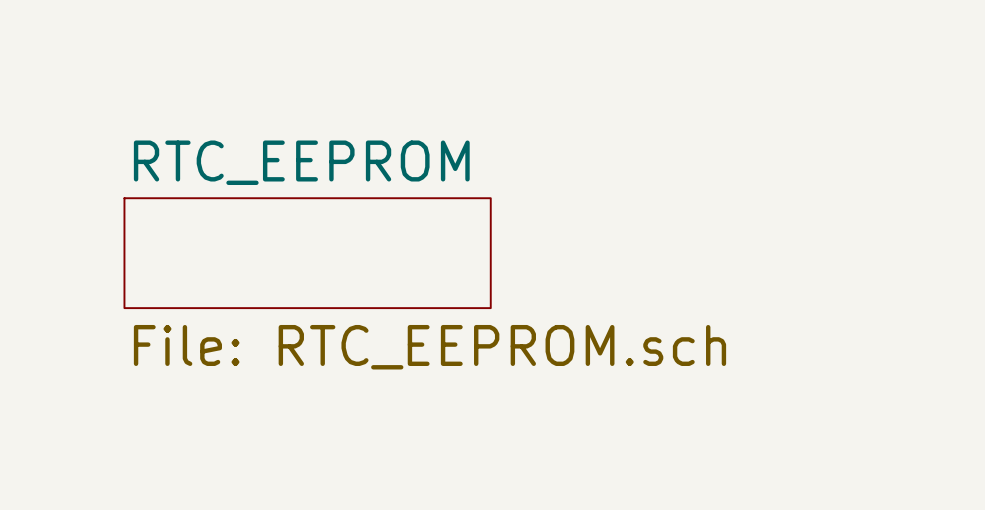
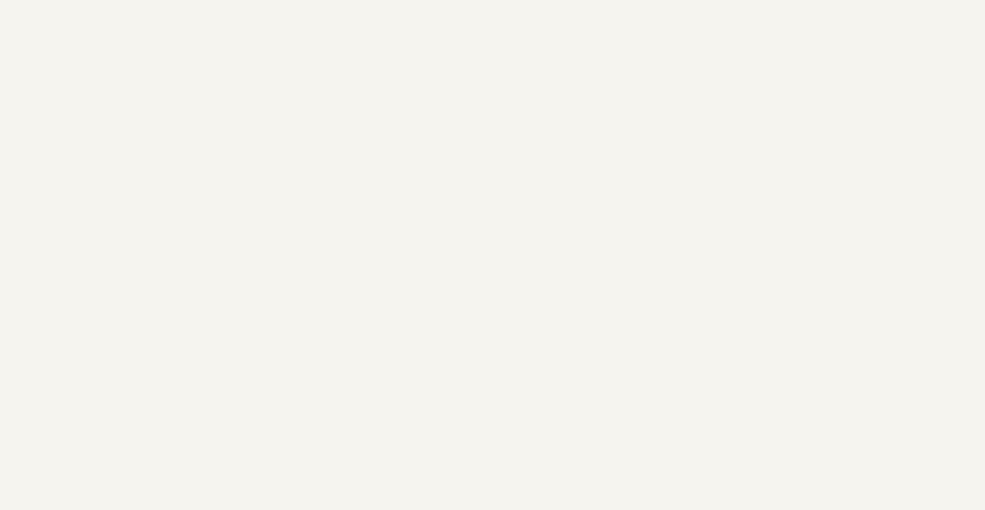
sheet RTC_EEPROM: File: RTC_EEPROM.sch (307, 253) -> none

